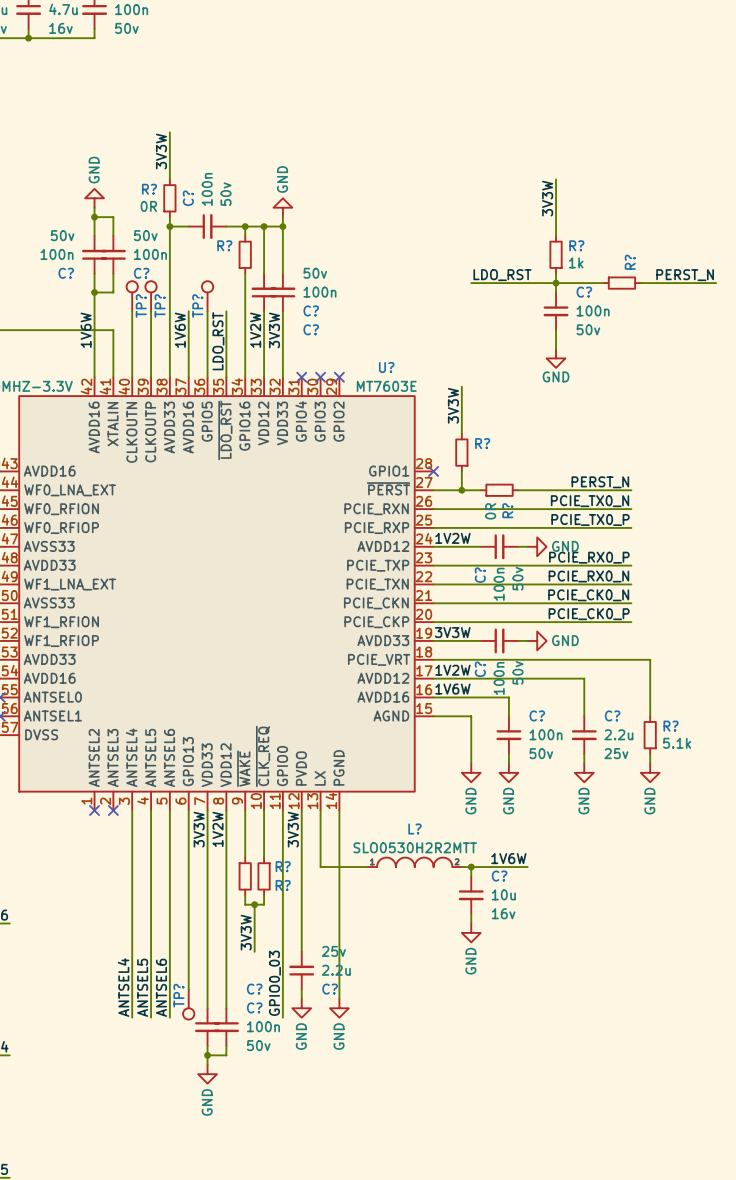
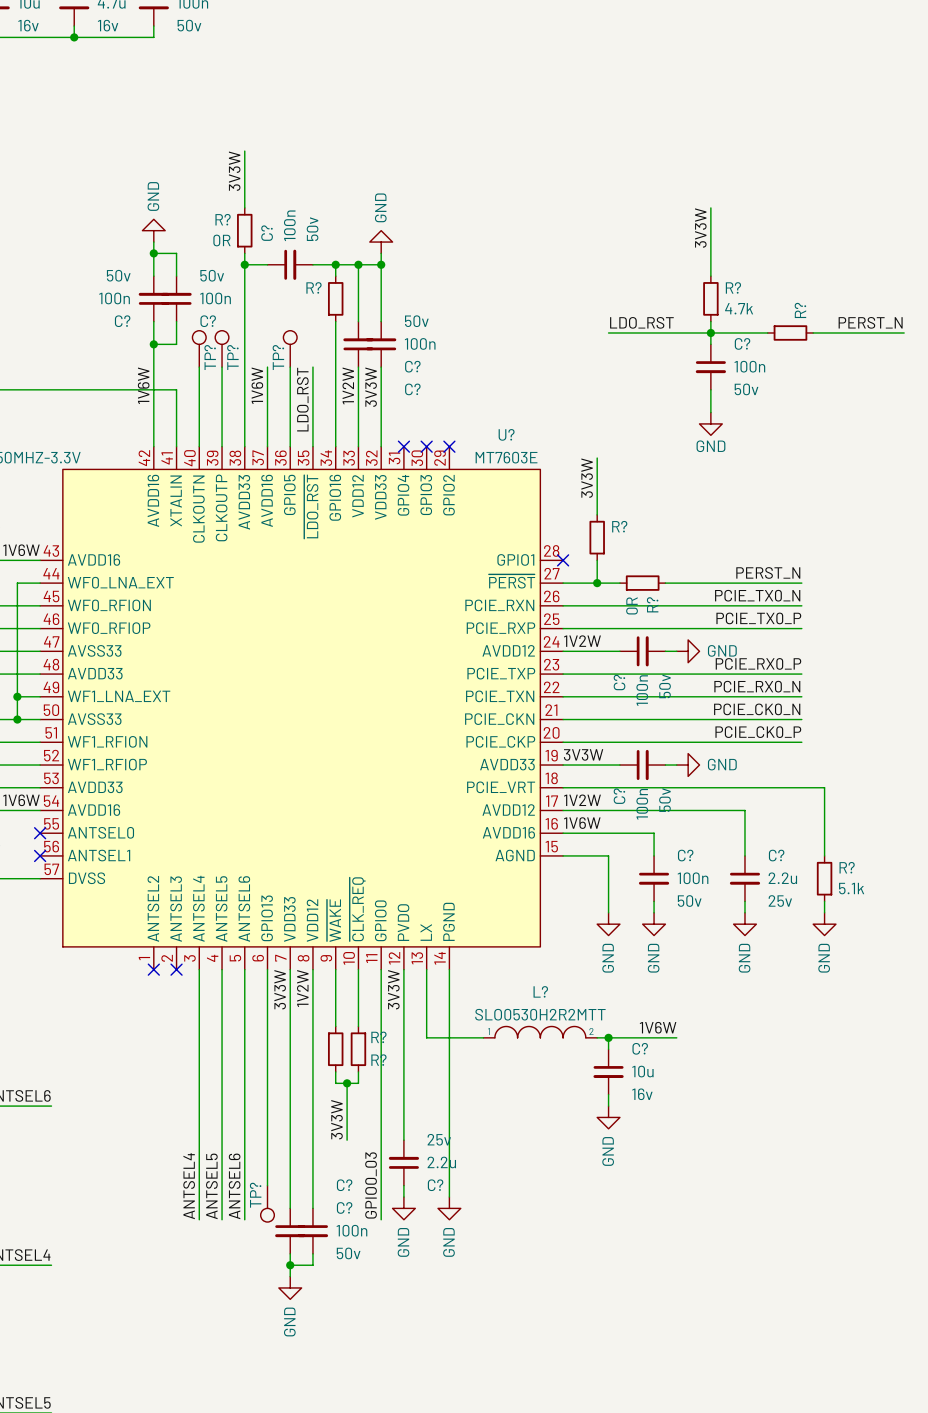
R? value: 1k (576, 262) -> 4.7k (739, 308)

